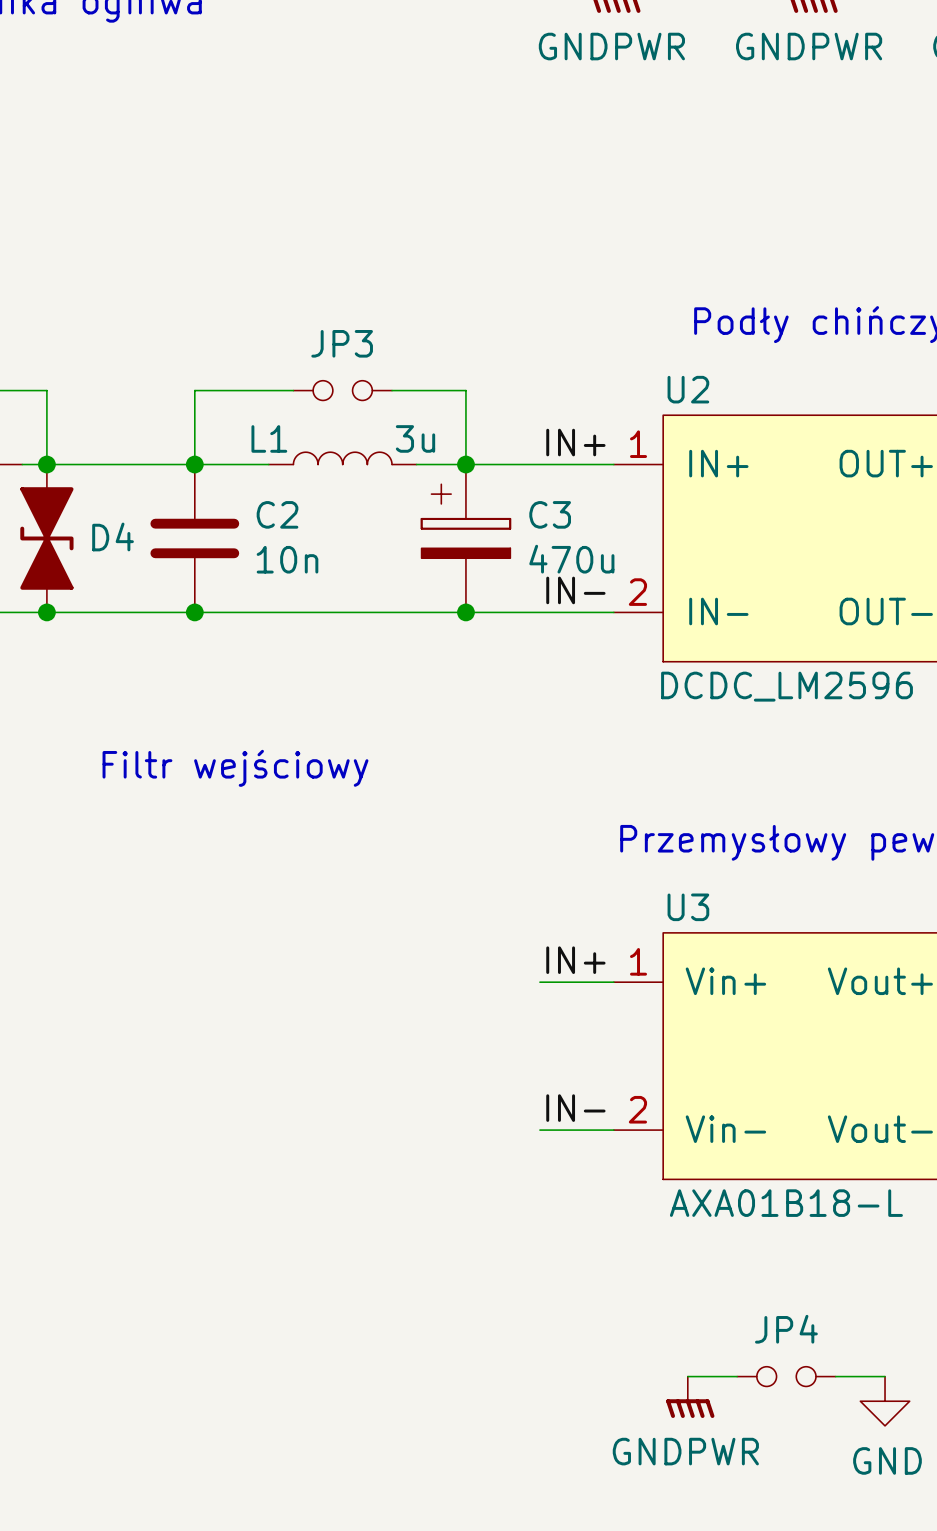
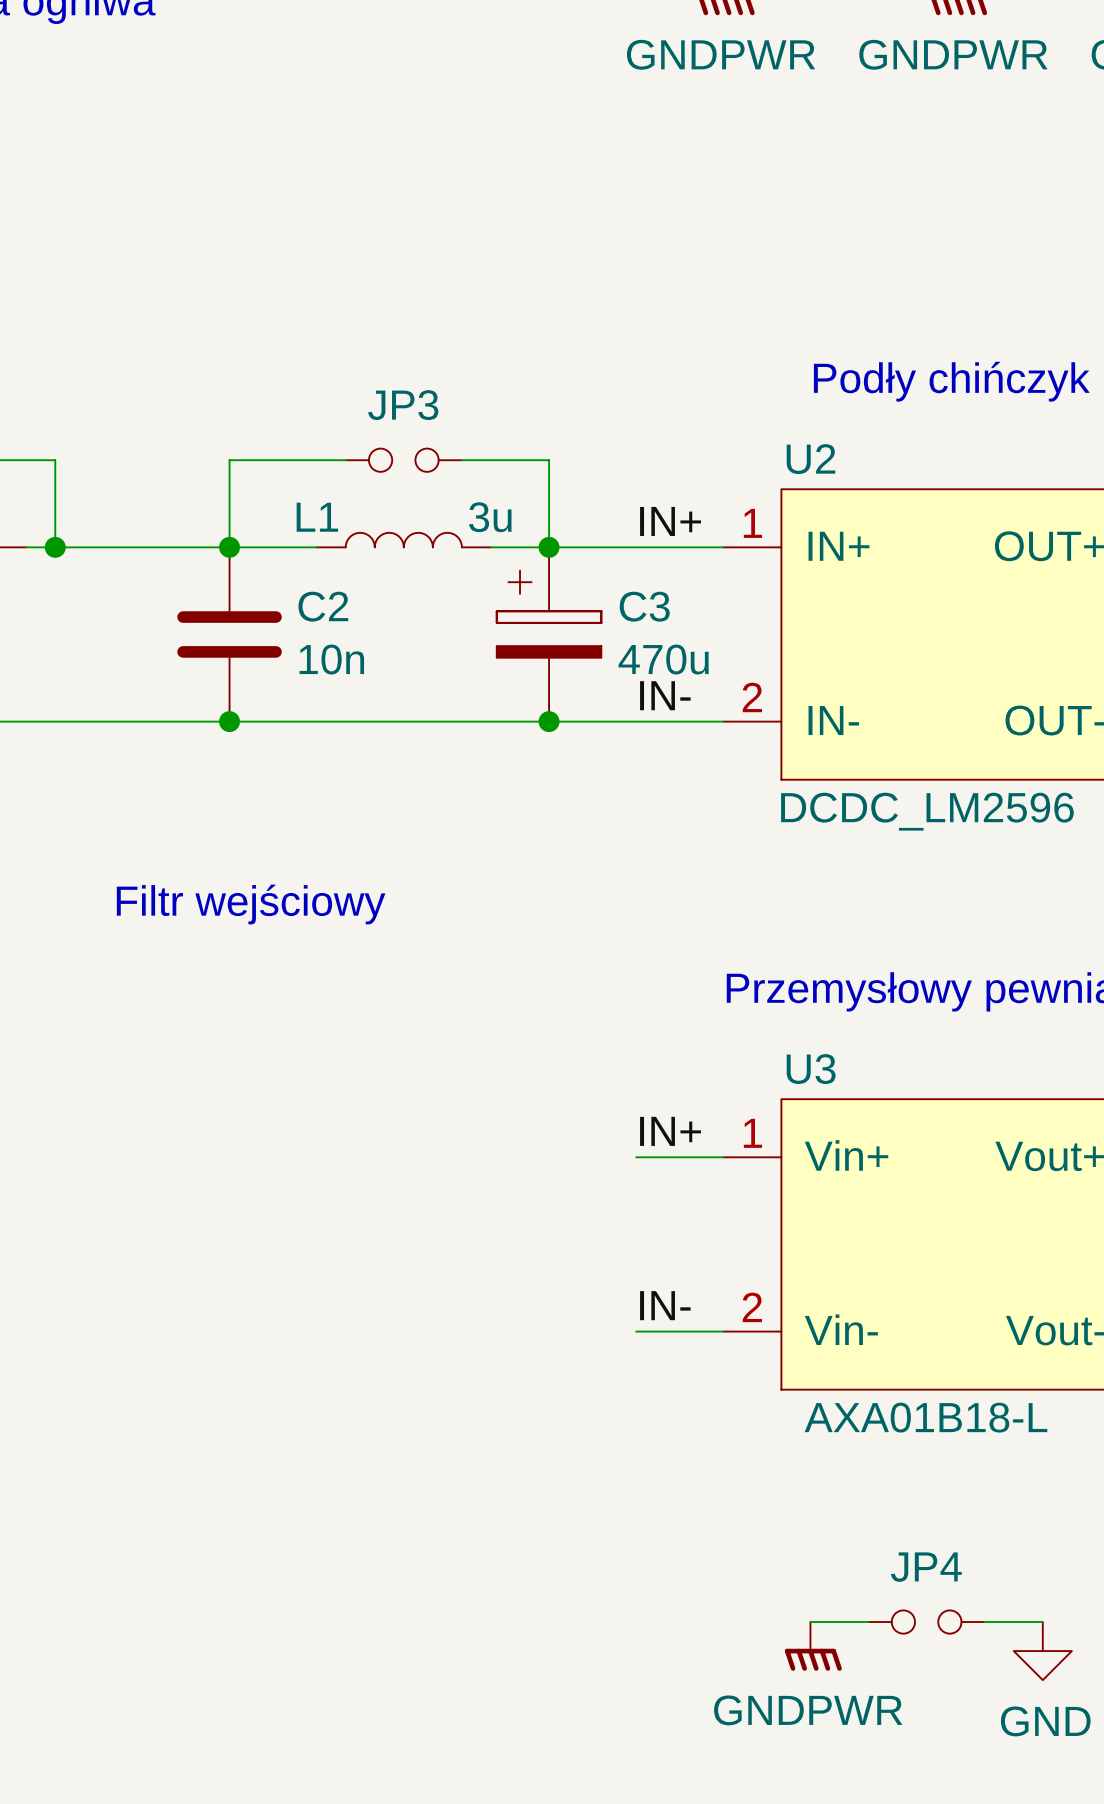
D4: (46, 538) -> none
junction: (46, 612) -> none

